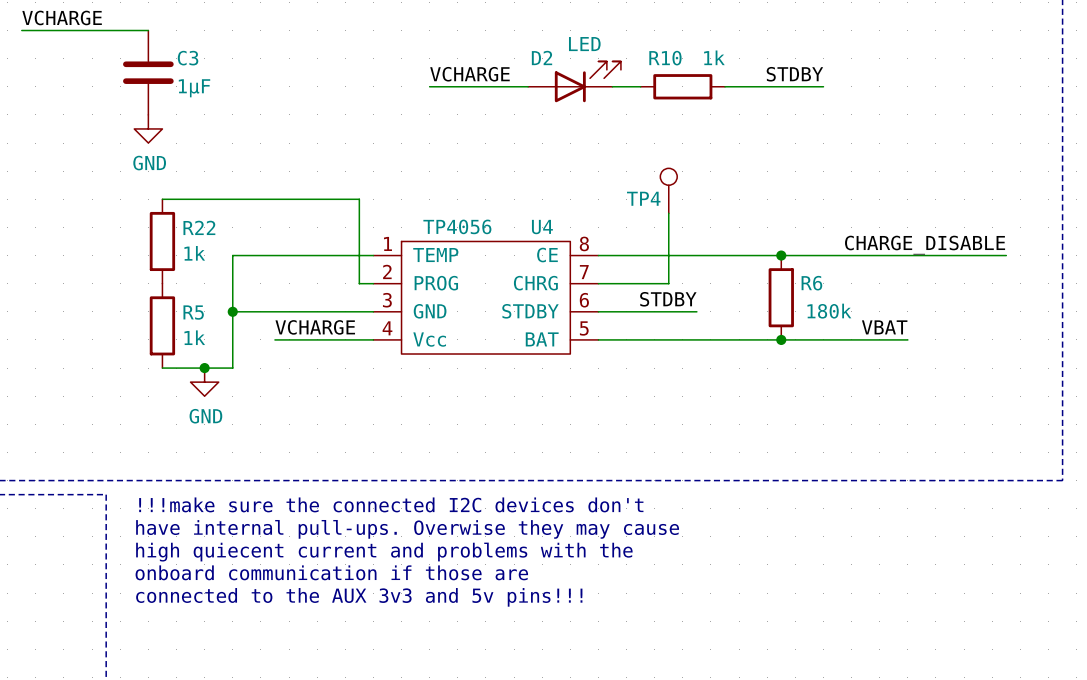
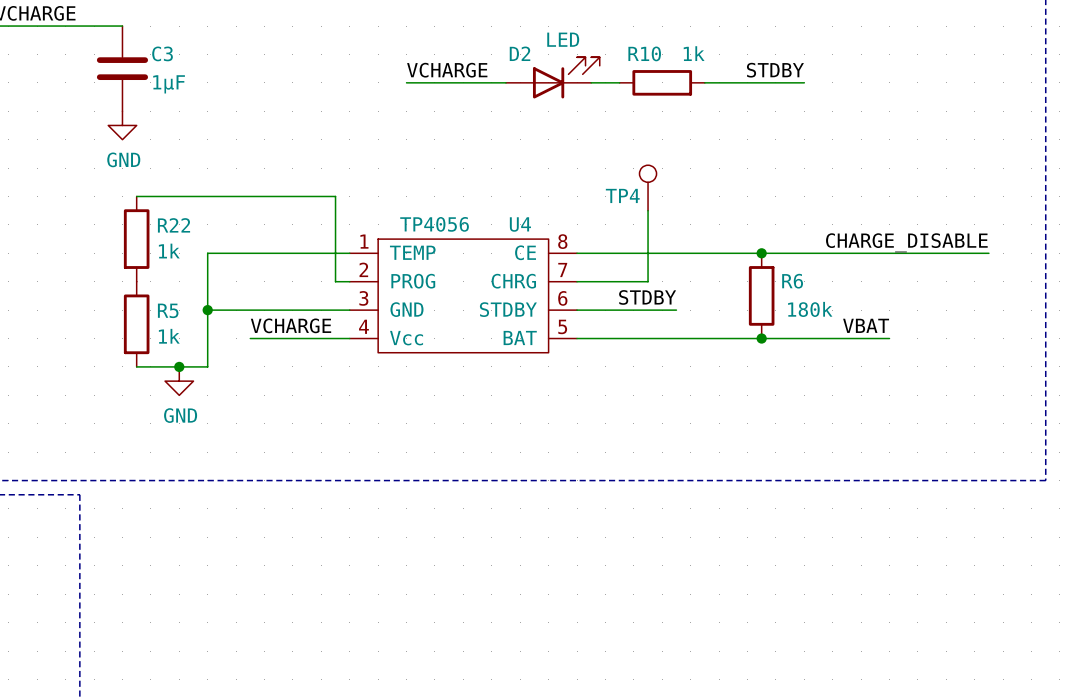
text: !!!make sure the connected I2C devices don't (391, 504) -> none
text: have internal pull-ups. Overwise they may cause (407, 529) -> none
text: high quiecent current and problems with the (384, 552) -> none
text: onboard communication if those are (331, 572) -> none
text: connected to the AUX 3v3 and 5v pins!!! (359, 597) -> none

